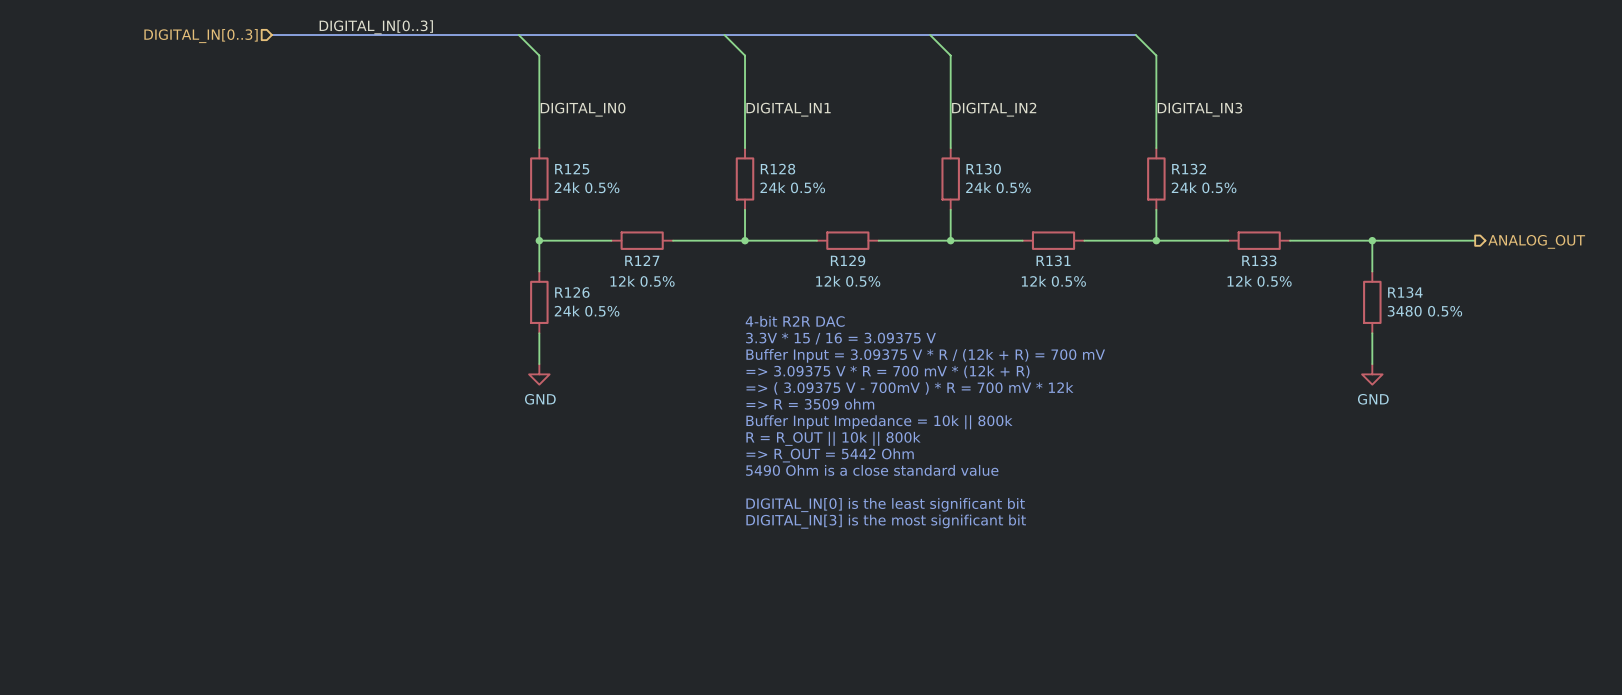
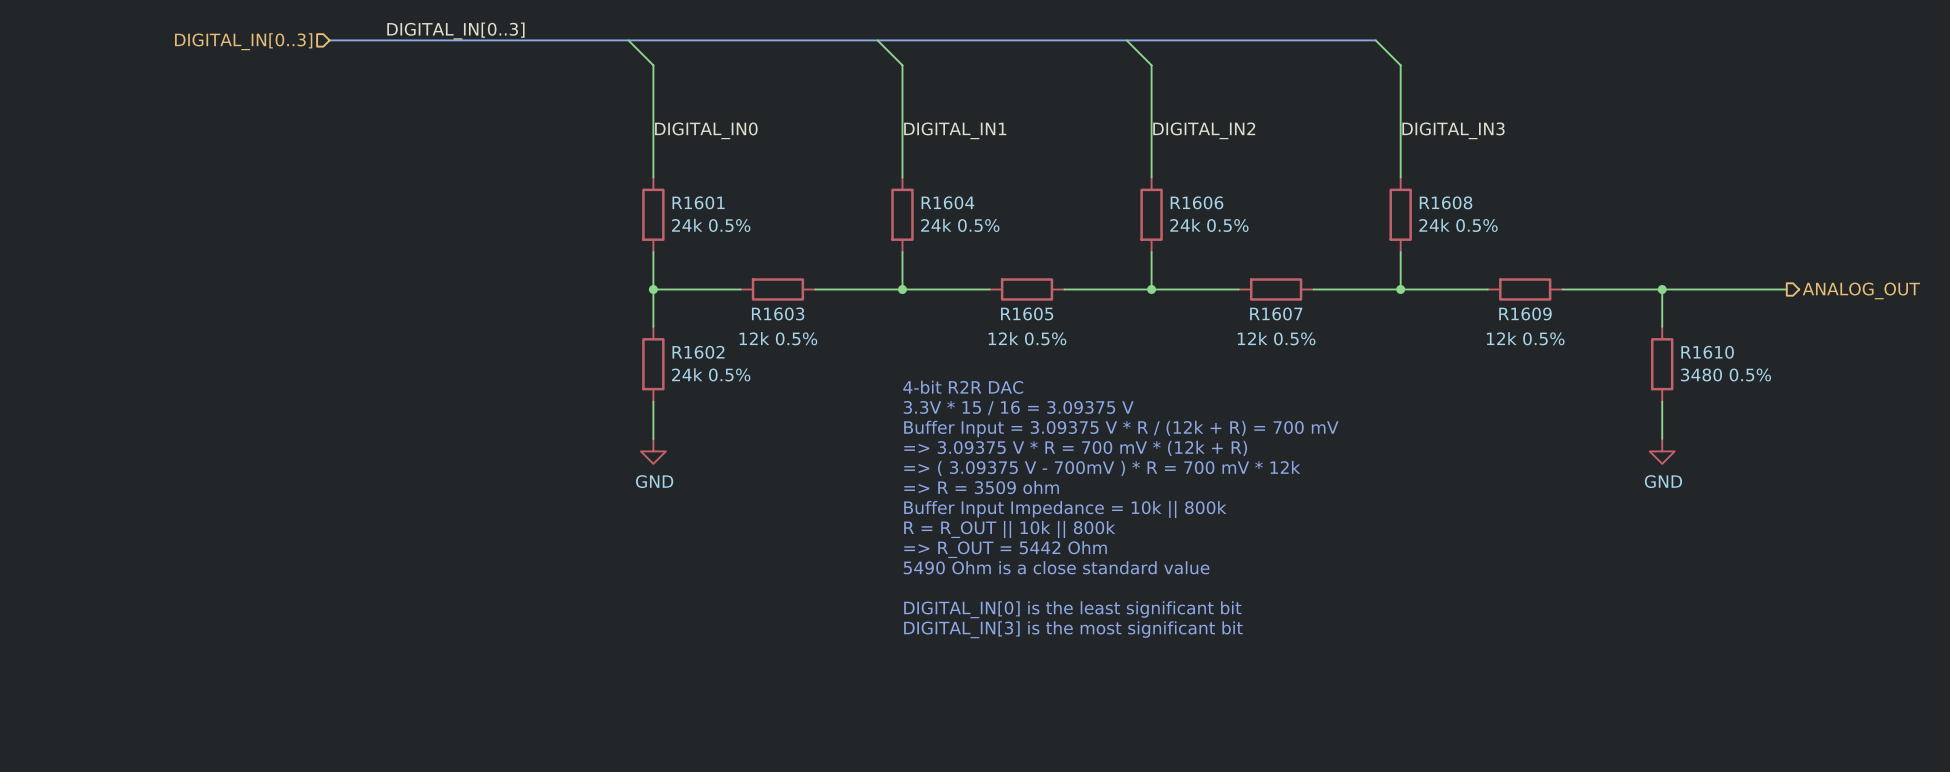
R125 name: R125 (572, 169) -> R1601 (698, 202)
R128 name: R128 (777, 169) -> R1604 (947, 202)
R130 name: R130 (983, 169) -> R1606 (1196, 202)
R132 name: R132 (1189, 169) -> R1608 (1446, 202)
R127 name: R127 (642, 260) -> R1603 (778, 313)
R129 name: R129 (848, 260) -> R1605 (1027, 313)
R131 name: R131 (1053, 260) -> R1607 (1276, 313)
R133 name: R133 (1259, 260) -> R1609 (1525, 313)
R126 name: R126 (572, 292) -> R1602 (698, 352)
R134 name: R134 (1405, 292) -> R1610 (1707, 352)

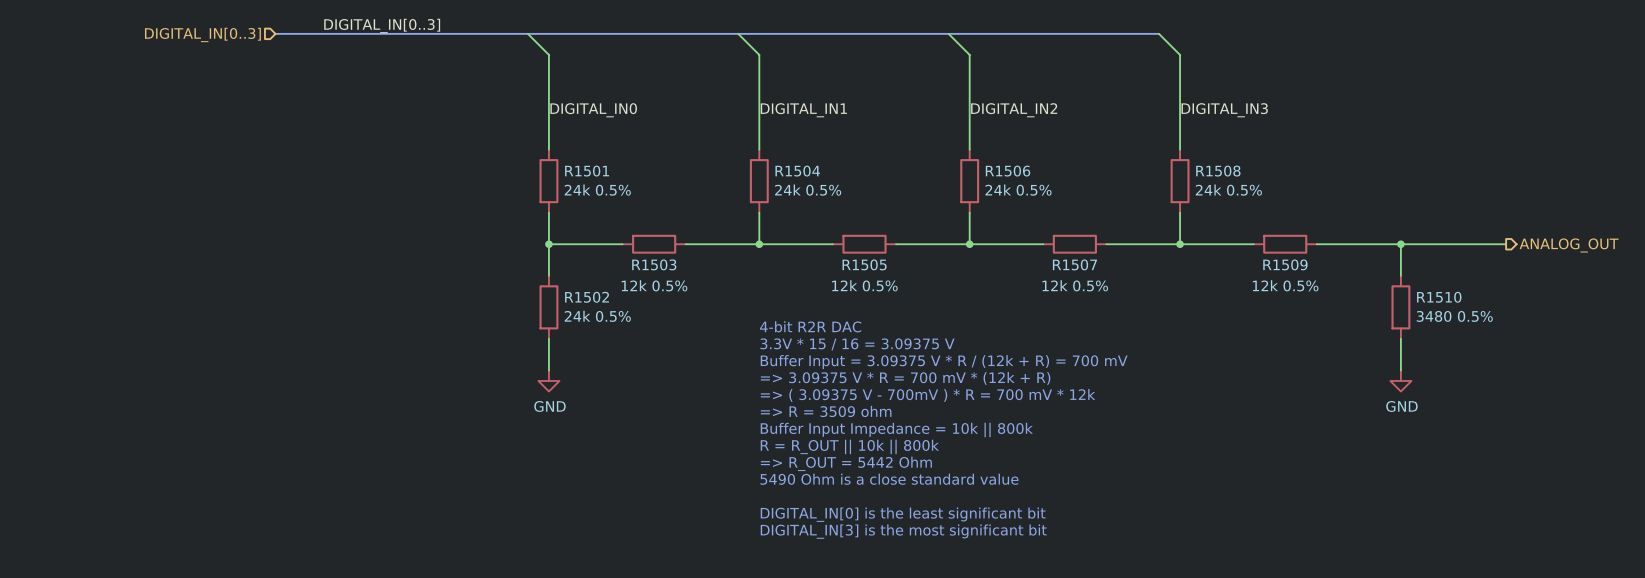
R1601 name: R1601 (698, 202) -> R1501 (587, 171)
R1604 name: R1604 (947, 202) -> R1504 (797, 171)
R1606 name: R1606 (1196, 202) -> R1506 (1008, 171)
R1608 name: R1608 (1446, 202) -> R1508 (1218, 171)
R1603 name: R1603 (778, 313) -> R1503 (654, 264)
R1605 name: R1605 (1027, 313) -> R1505 (864, 264)
R1607 name: R1607 (1276, 313) -> R1507 (1074, 264)
R1609 name: R1609 (1525, 313) -> R1509 (1285, 264)
R1602 name: R1602 (698, 352) -> R1502 (587, 297)
R1610 name: R1610 (1707, 352) -> R1510 (1439, 297)

